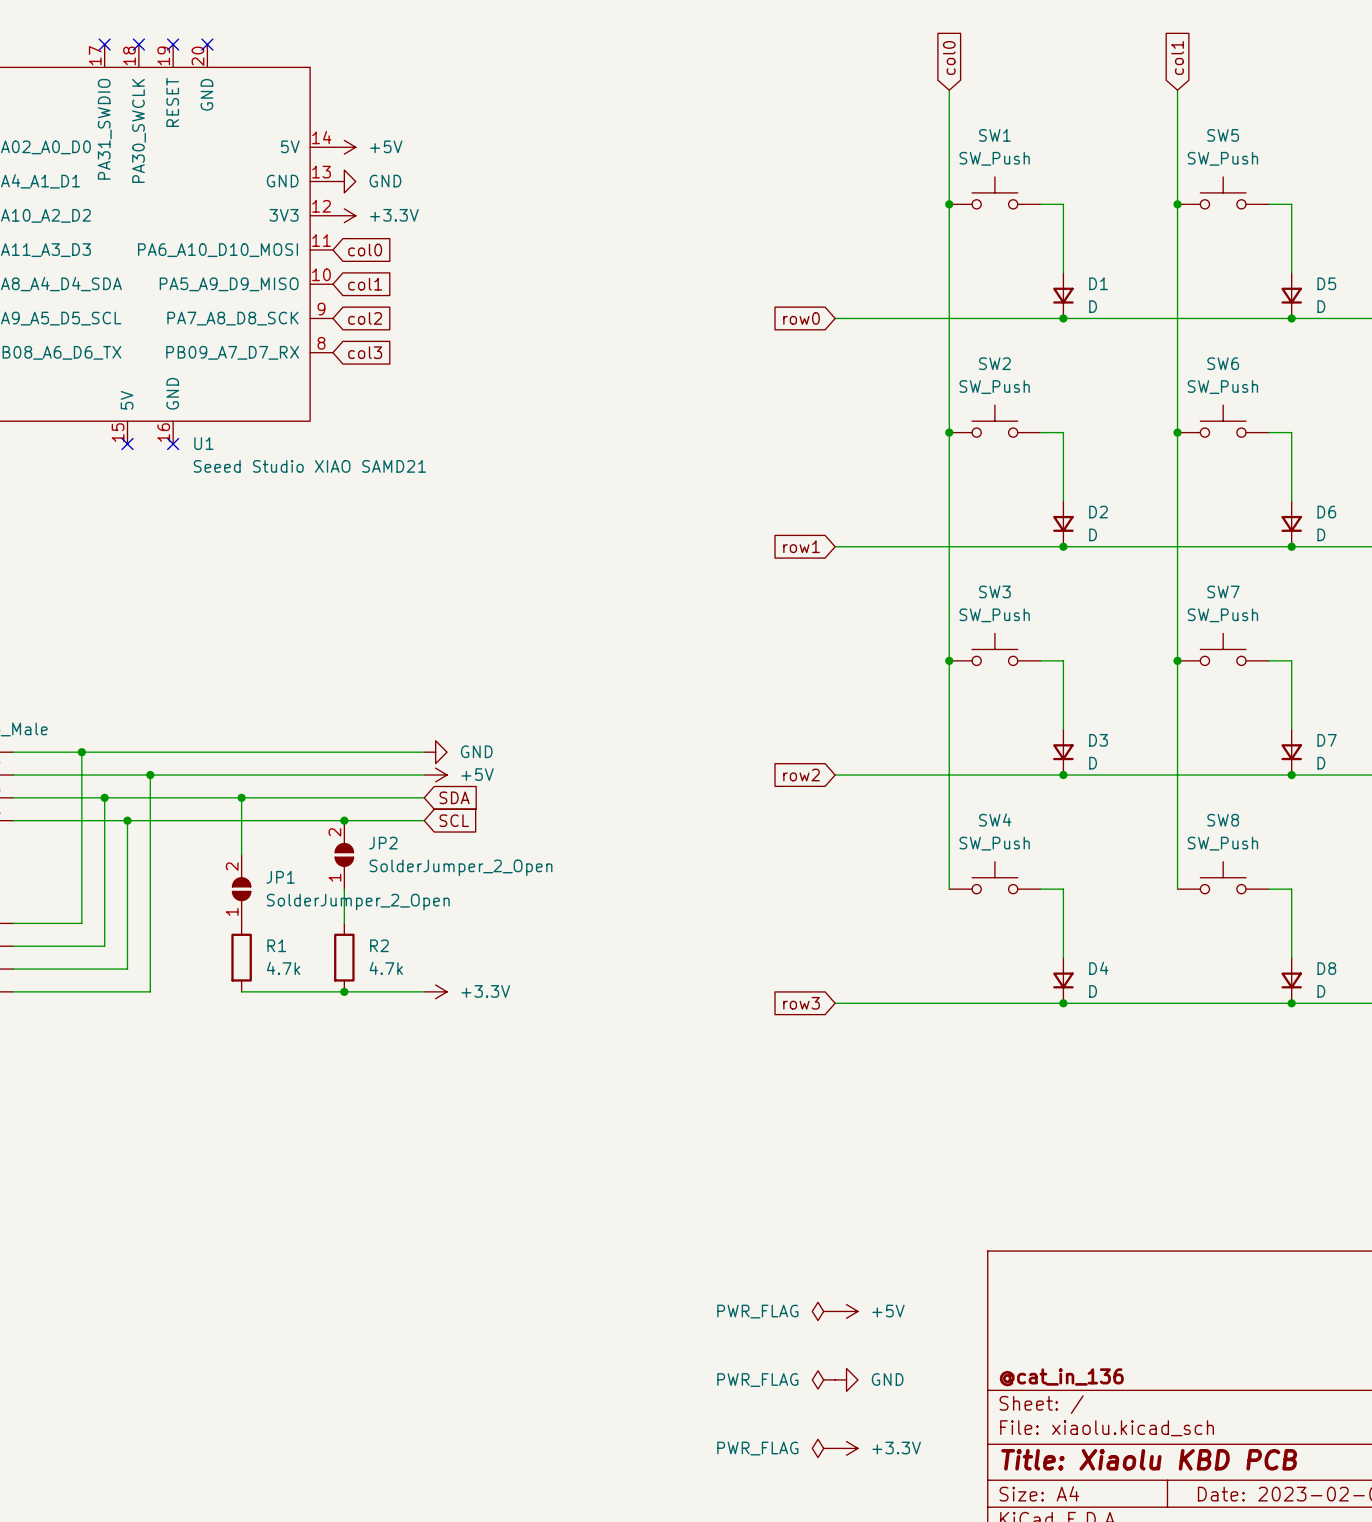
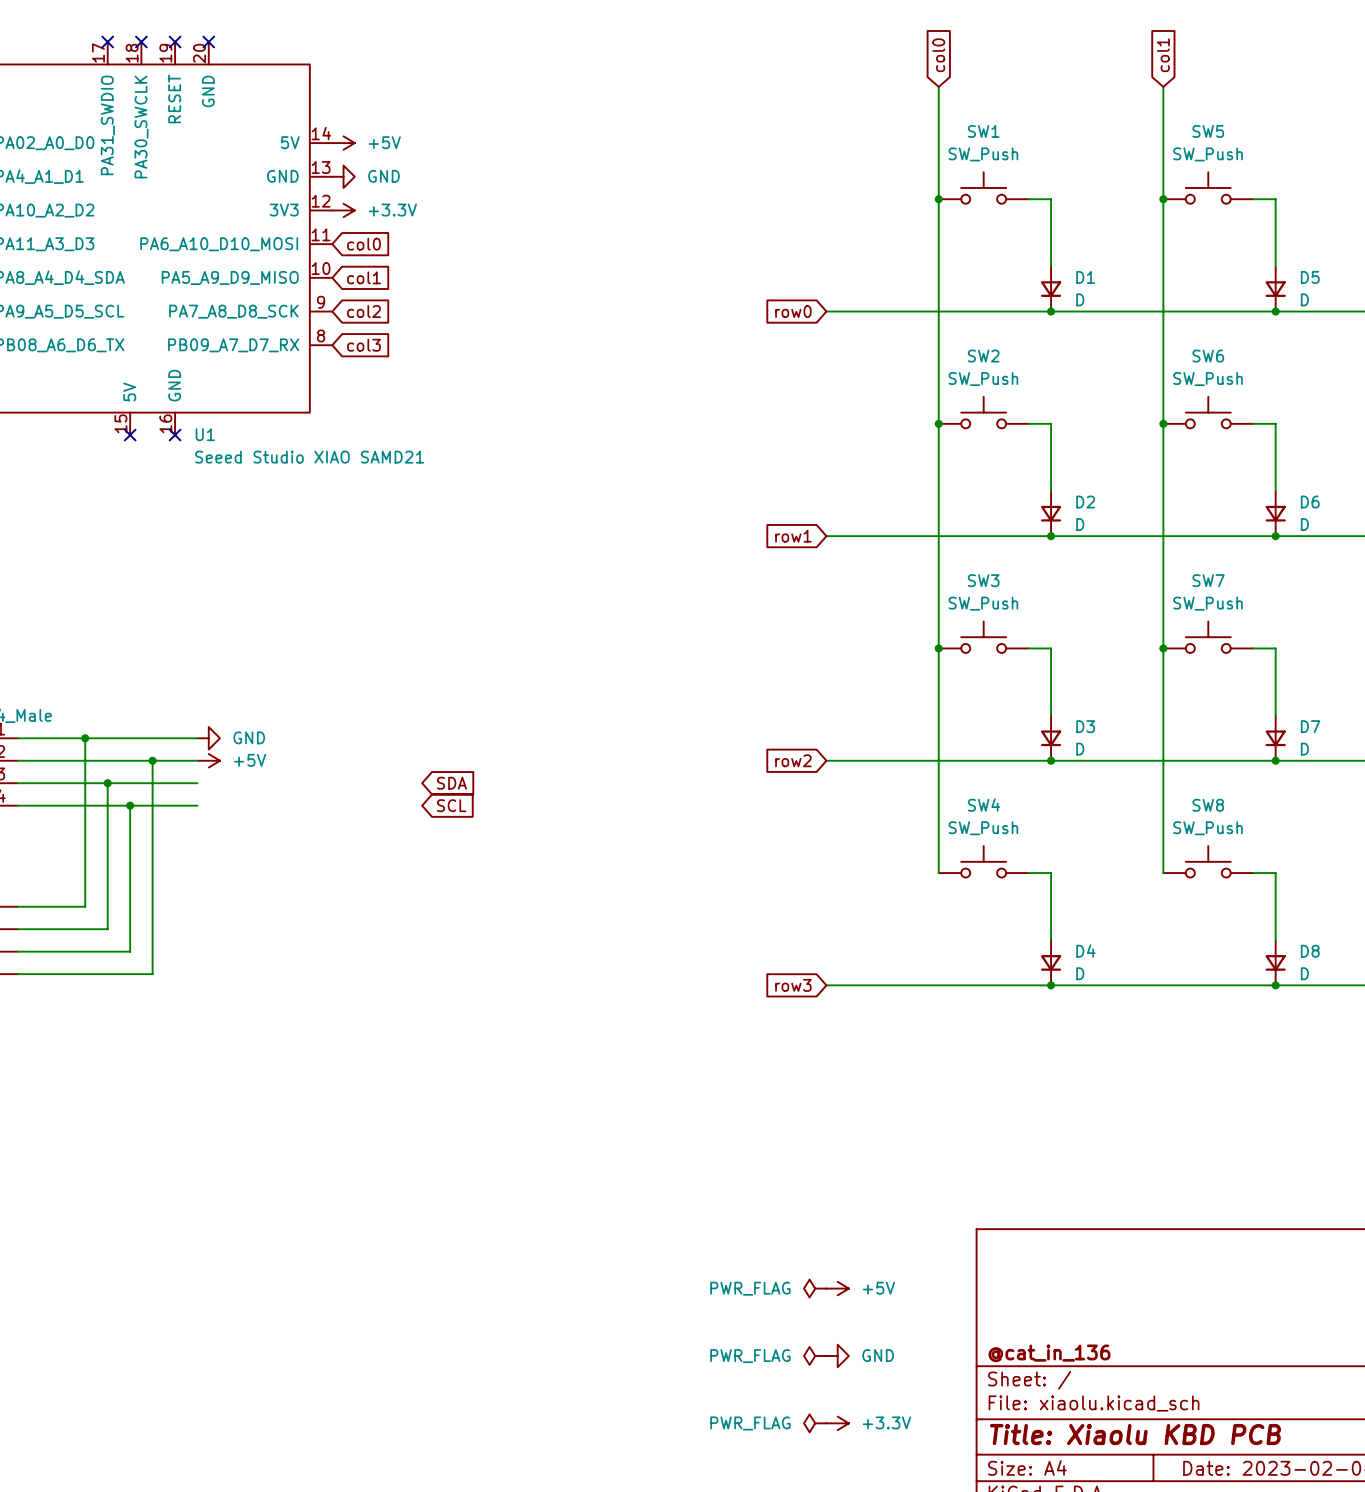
wire: (195, 752) (424, 752) -> none
power symbol: none -> GND (208, 738)
power symbol: GND (435, 752) -> none
wire: (195, 775) (424, 775) -> none
power symbol: none -> +5V (208, 760)
power symbol: +5V (435, 775) -> none
wire: (195, 797) (424, 797) -> none
wire: (241, 797) (241, 854) -> none
junction: (241, 797) -> none
wire: (195, 820) (424, 820) -> none
junction: (344, 820) -> none
JP2: SolderJumper_2_Open (344, 854) -> none
JP1: SolderJumper_2_Open (241, 889) -> none
wire: (344, 889) (344, 923) -> none
R1: 4.7k (241, 957) -> none
R2: 4.7k (344, 957) -> none
wire: (241, 991) (424, 991) -> none
junction: (344, 991) -> none
power symbol: +3.3V (435, 991) -> none

